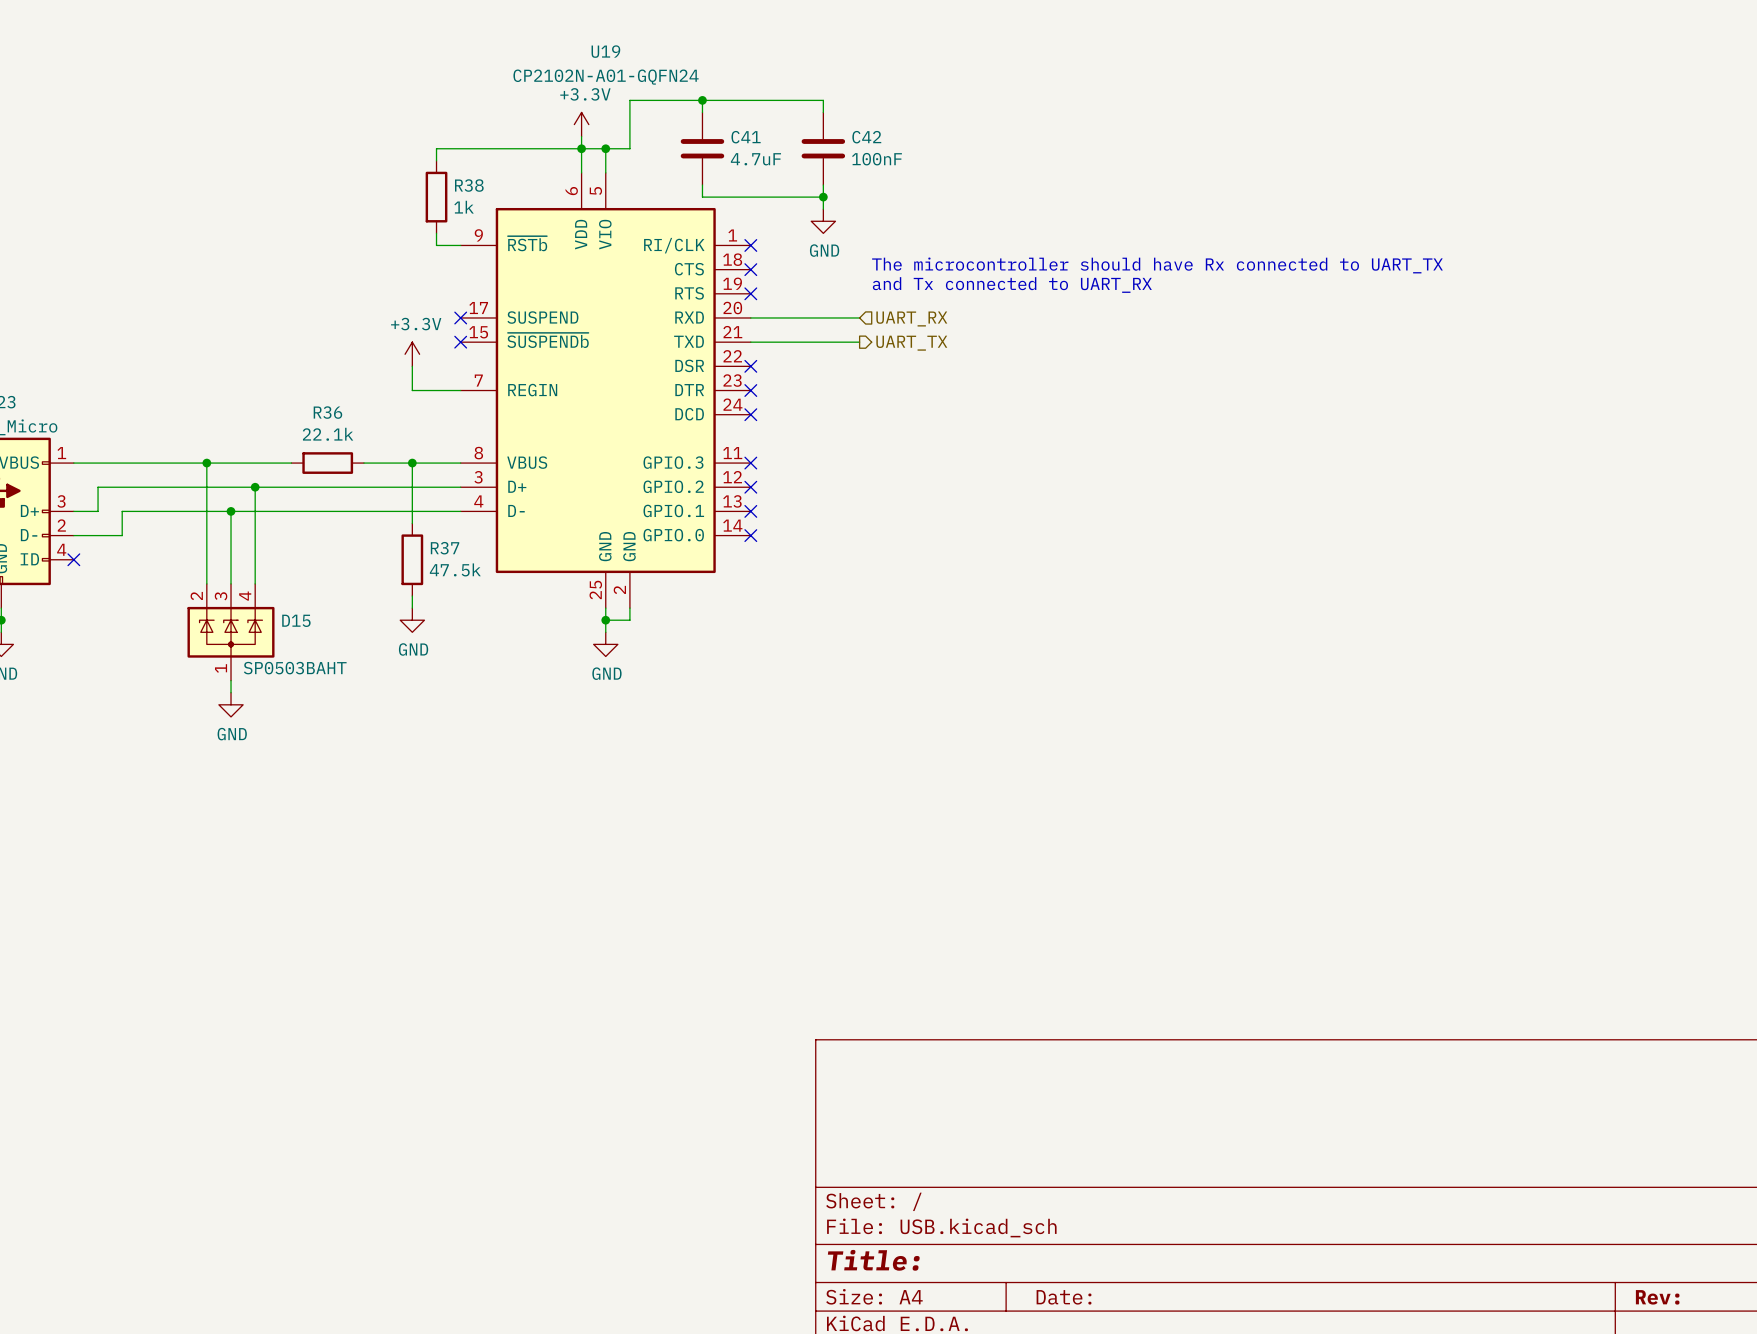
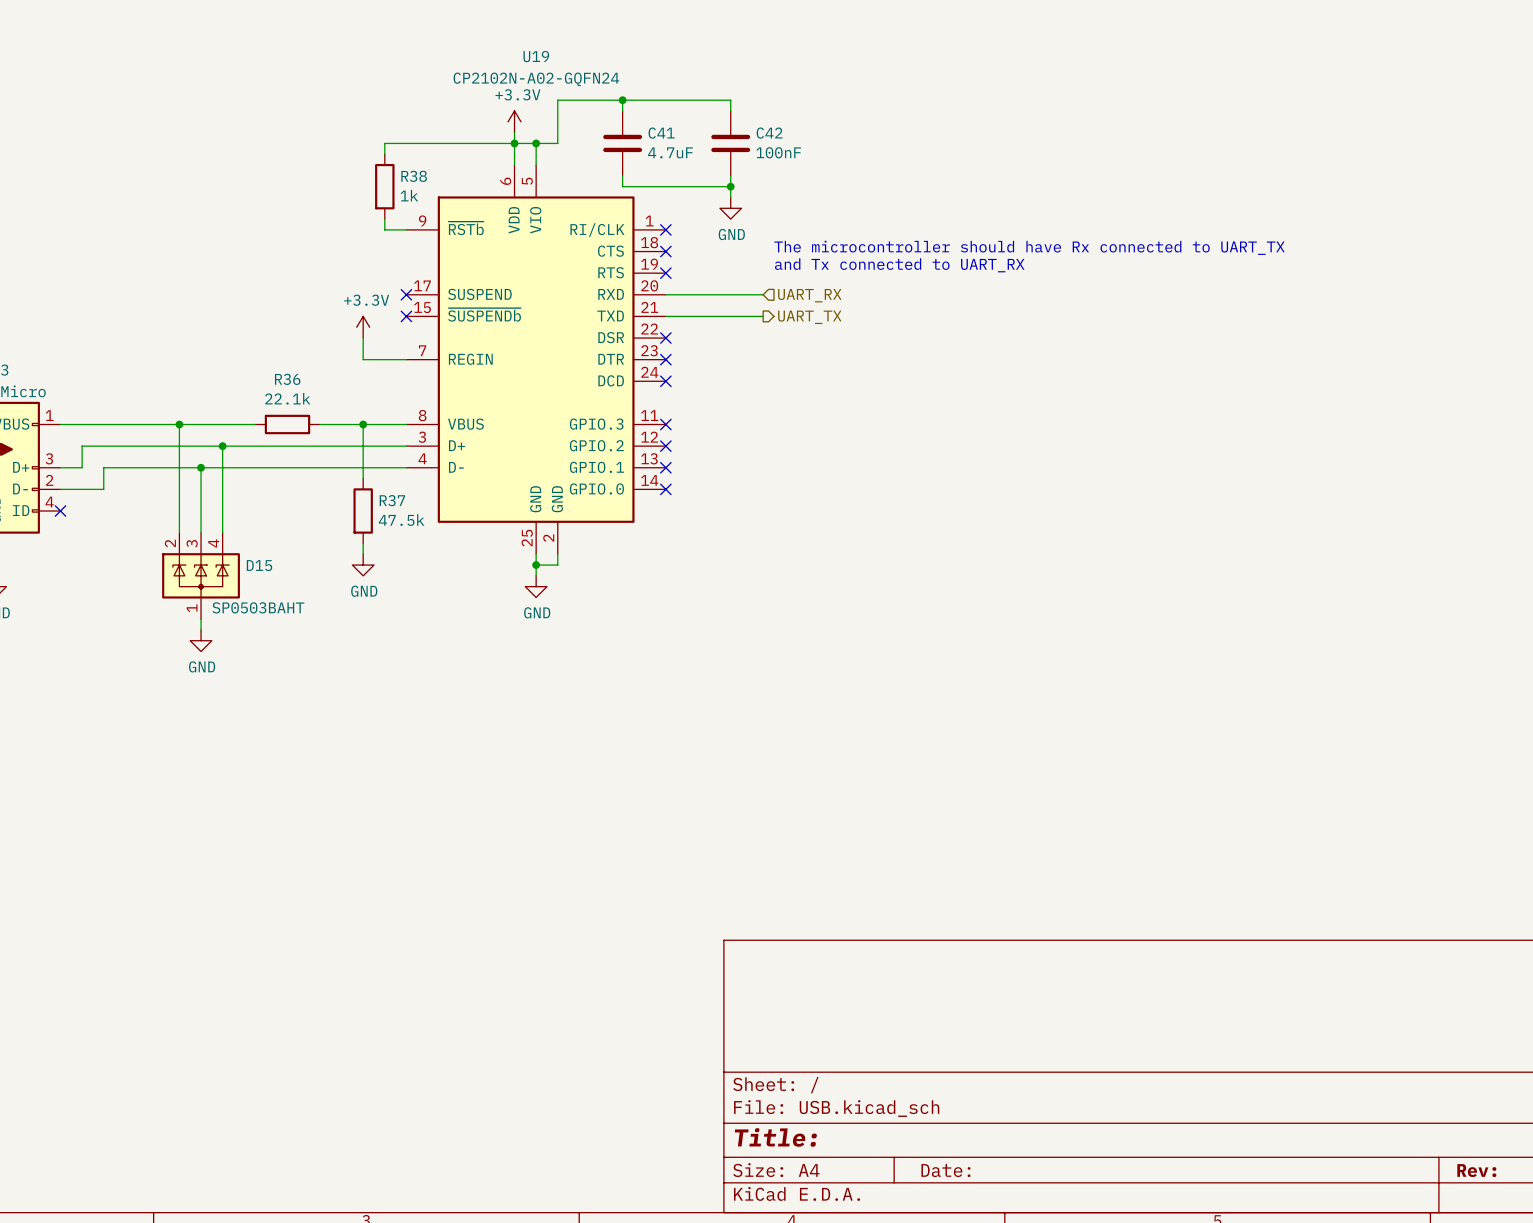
U19 value: CP2102N-A01-GQFN24 (606, 77) -> CP2102N-A02-GQFN24 (536, 79)

